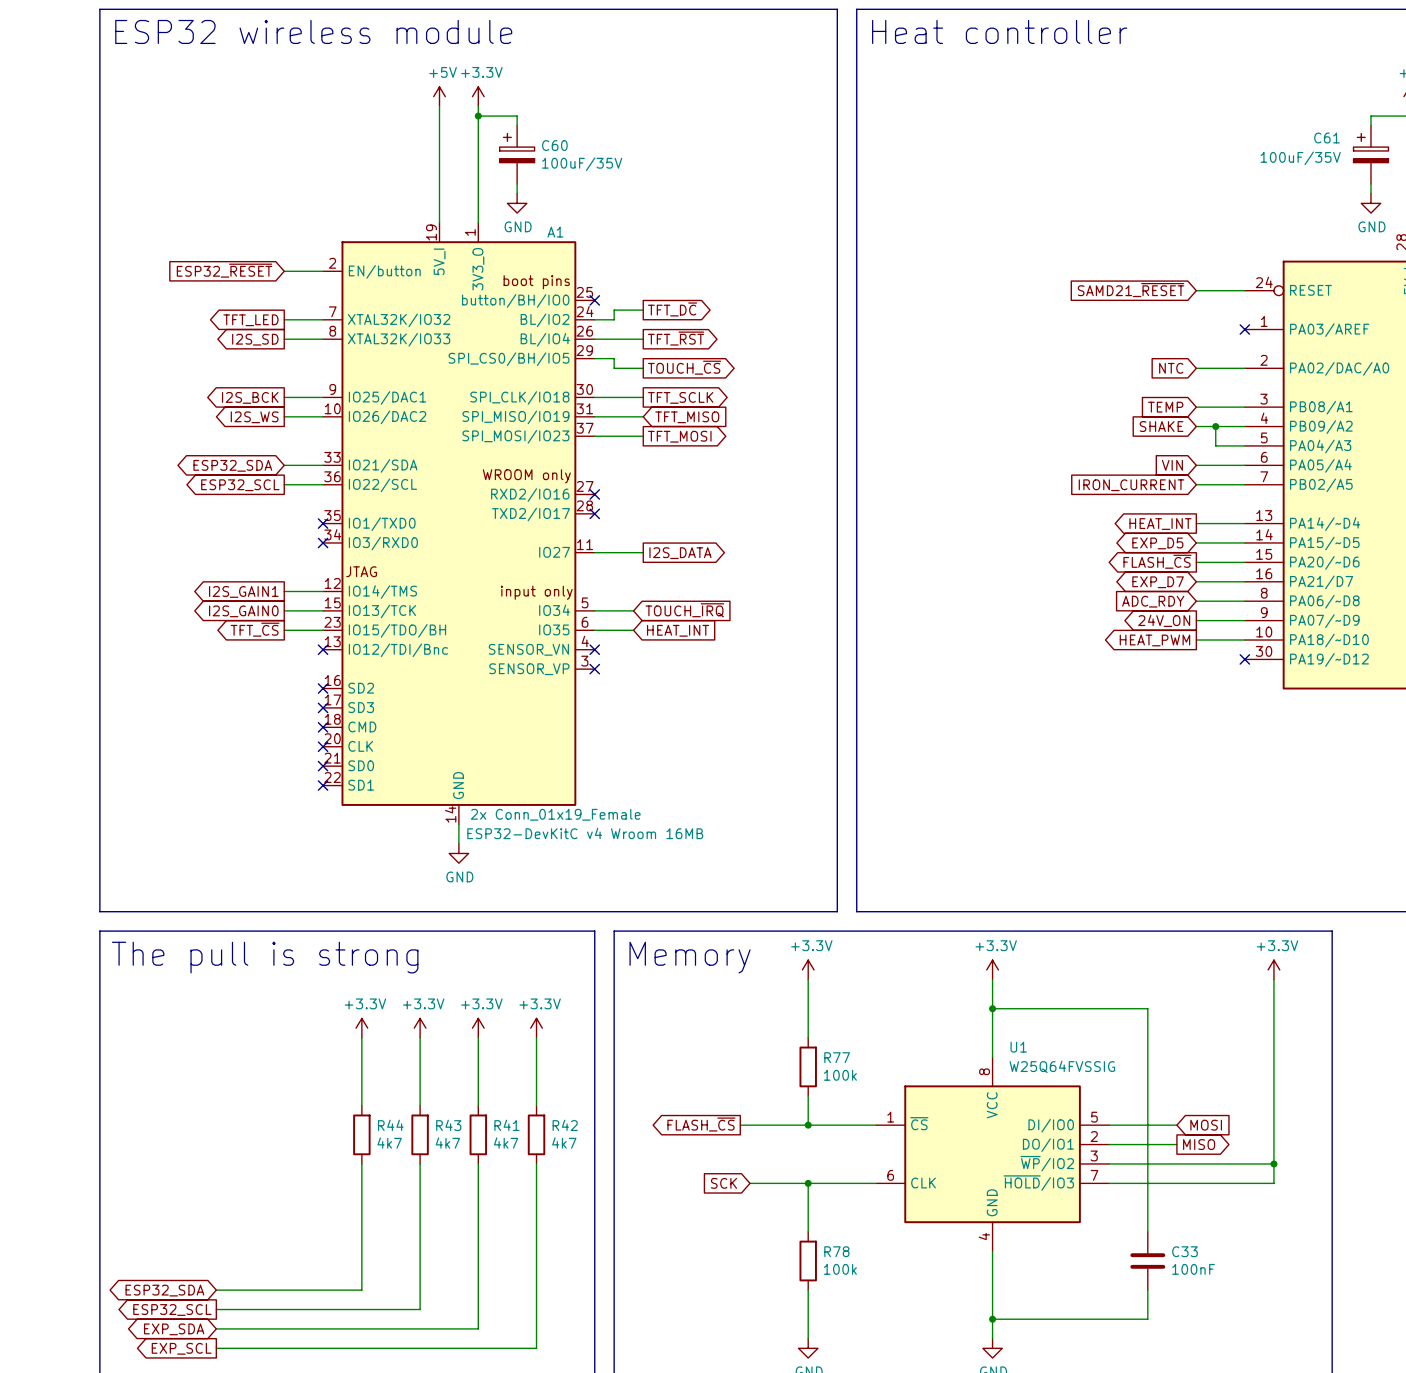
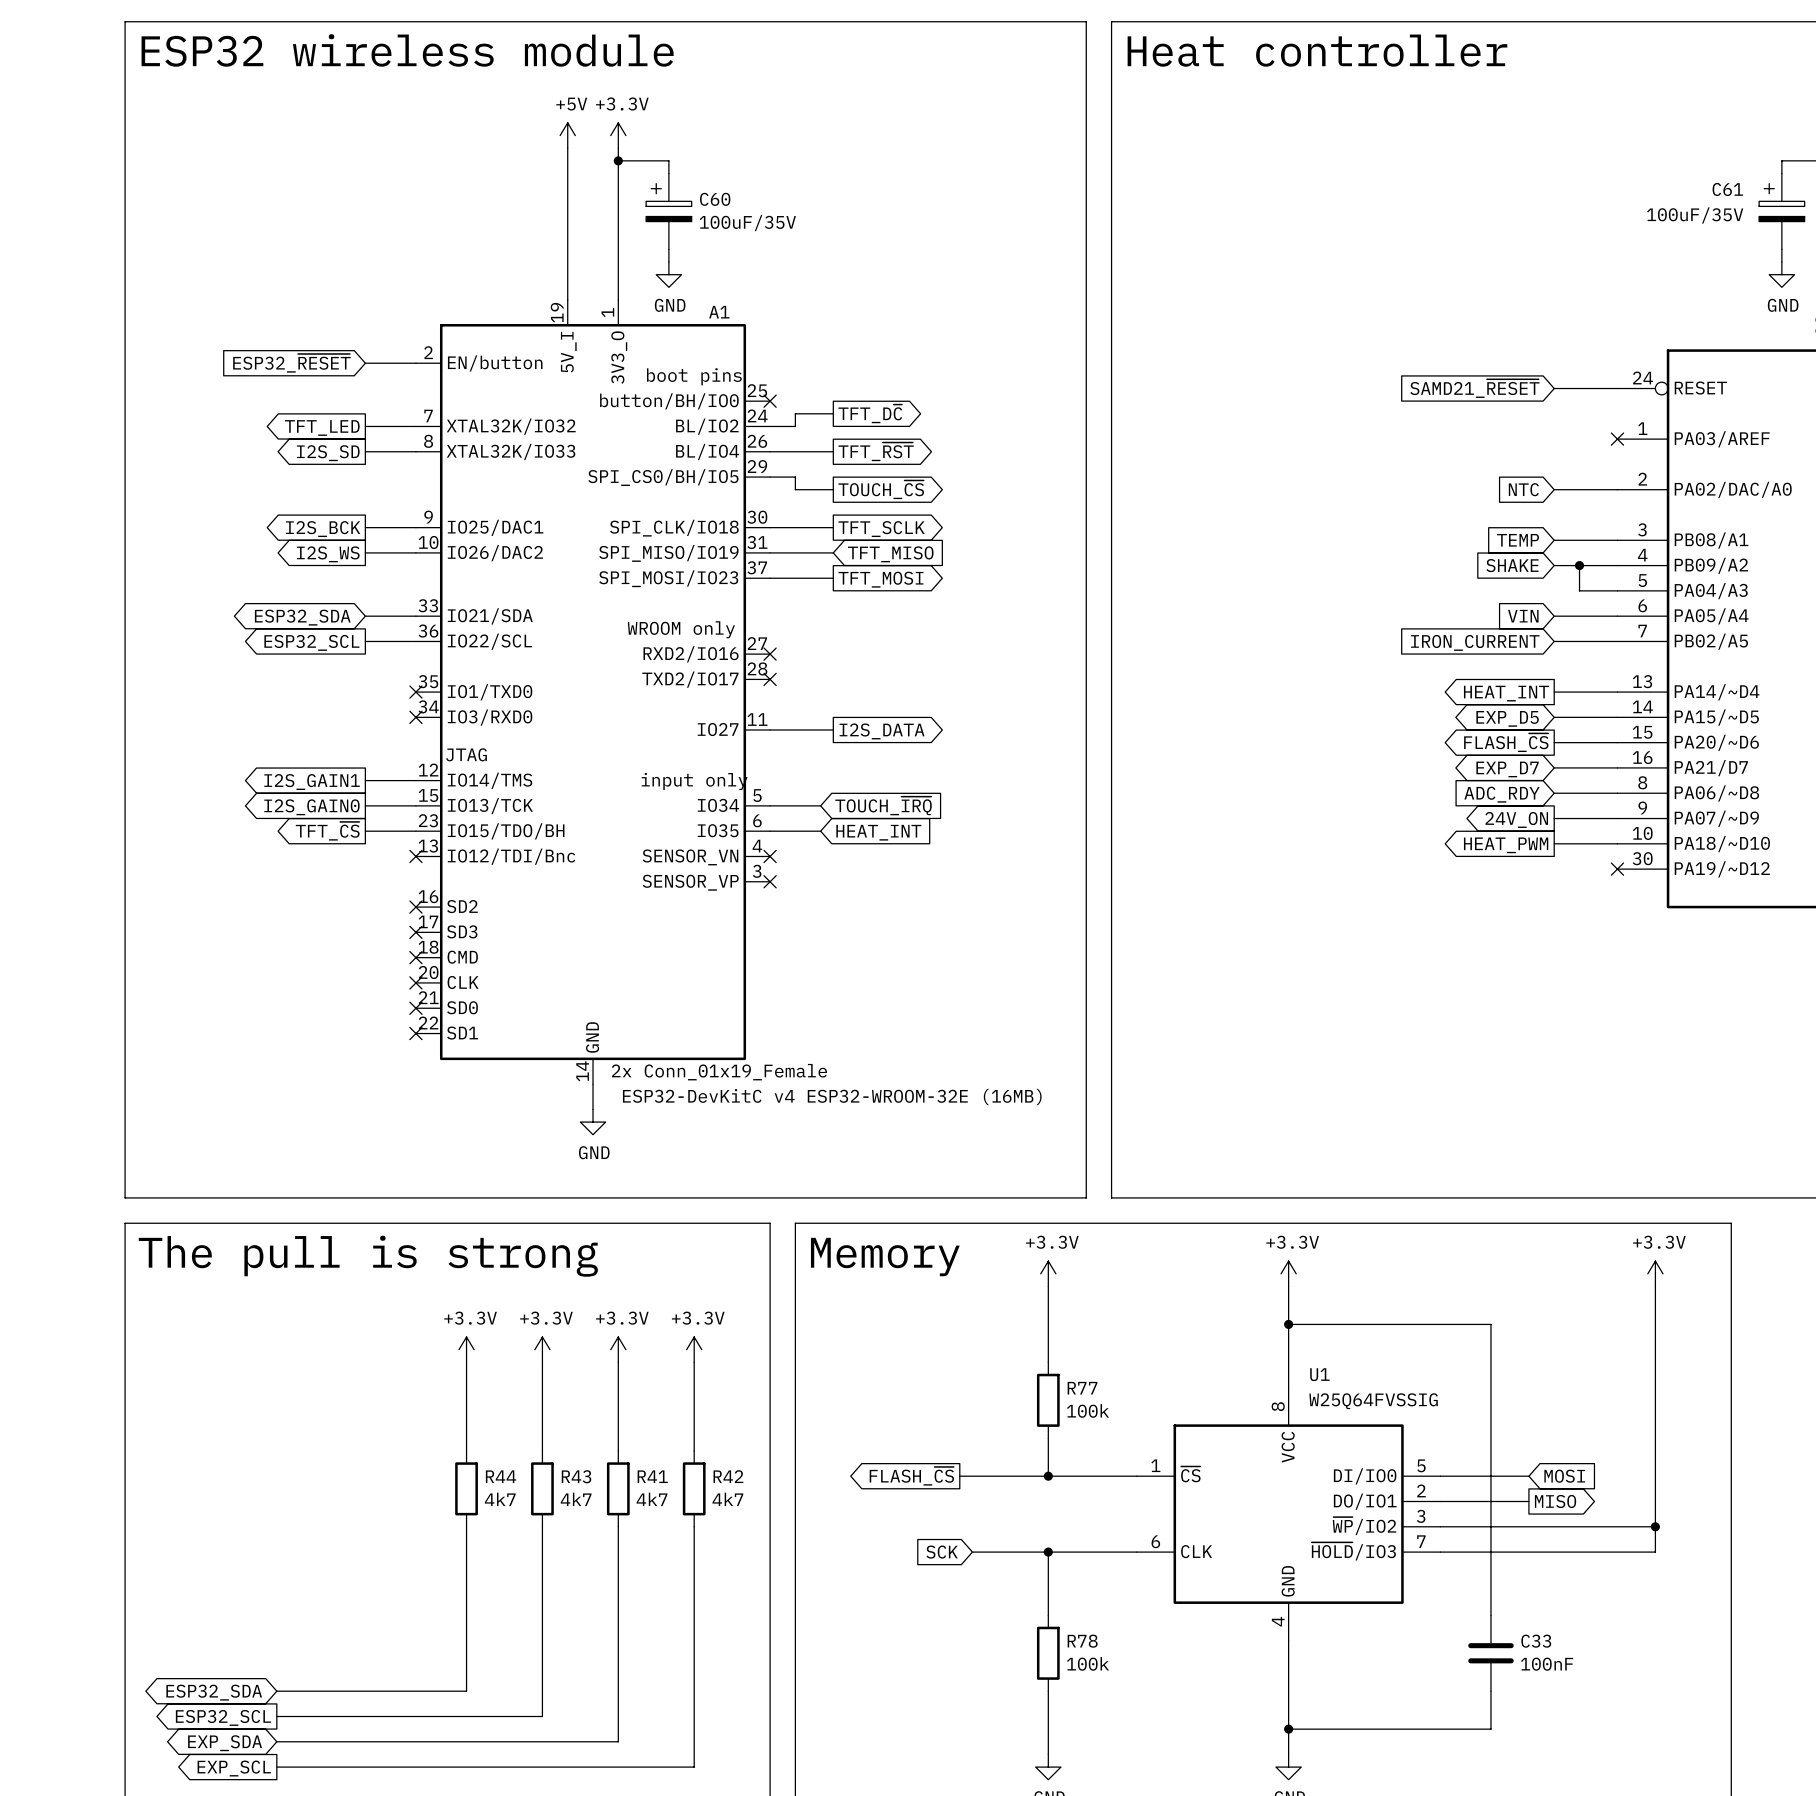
A1 text: ESP32-DevKitC v4 Wroom 16MB (585, 833) -> ESP32-DevKitC v4 ESP32-WROOM-32E (16MB) (832, 1096)

